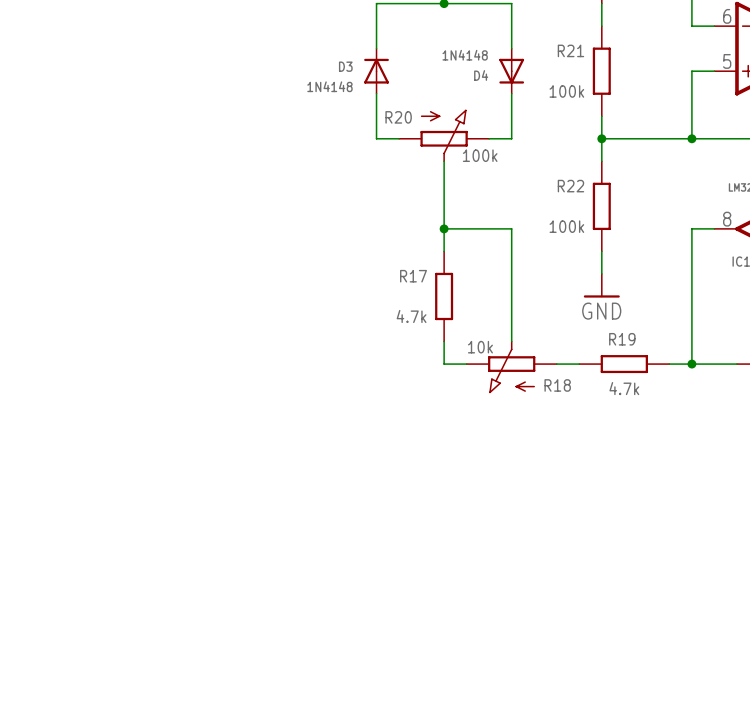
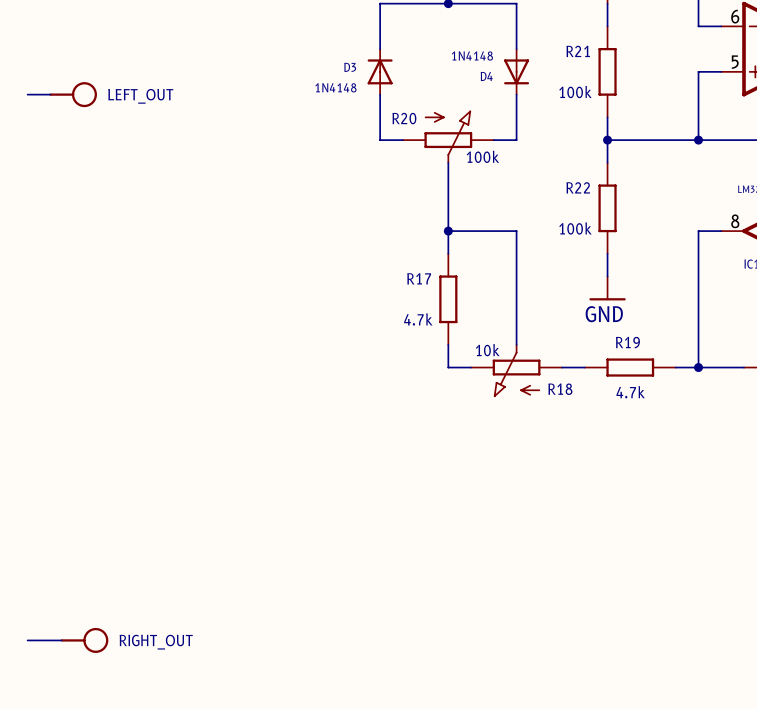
wire: none -> (27, 94) (50, 94)
LEFT_OUT: none -> (73, 94)
wire: none -> (27, 640) (61, 640)
RIGHT_OUT: none -> (84, 640)

